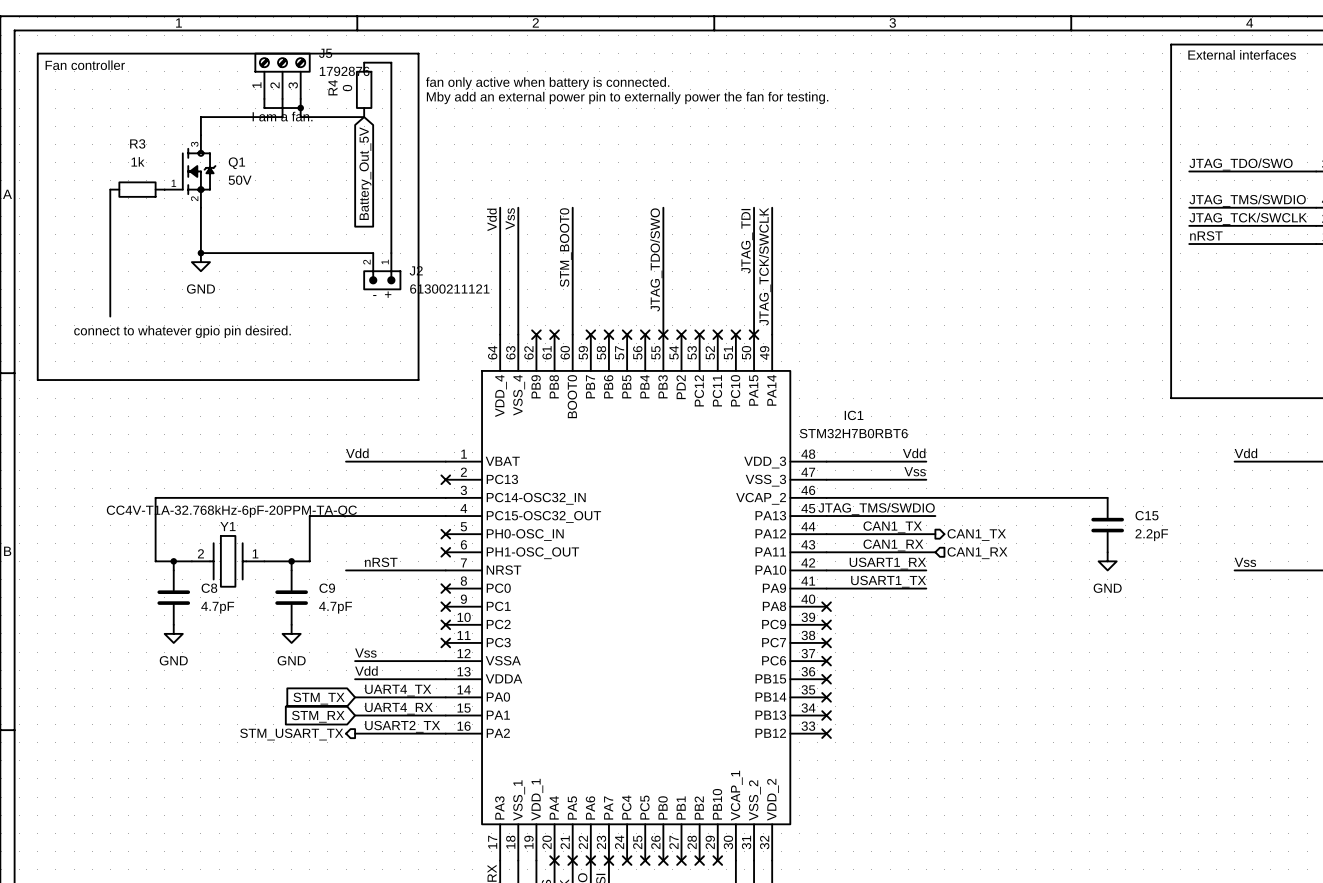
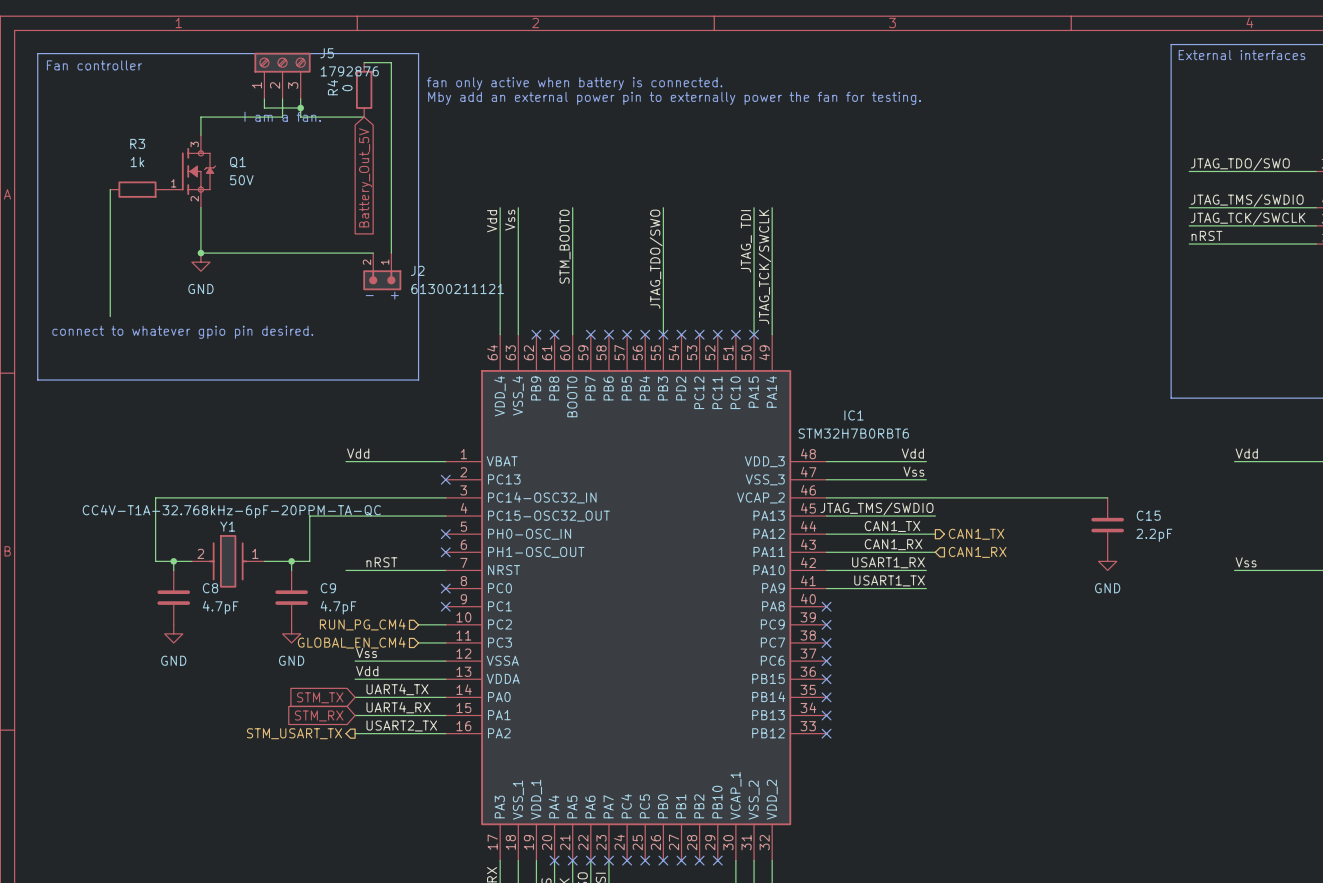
wire: none -> (418, 624) (445, 624)
no-connect mark: (445, 624) -> none
hierarchical label: none -> RUN_PG_CM4 (362, 624)
wire: none -> (418, 642) (445, 642)
no-connect mark: (445, 642) -> none
hierarchical label: none -> GLOBAL_EN_CM4 (351, 642)

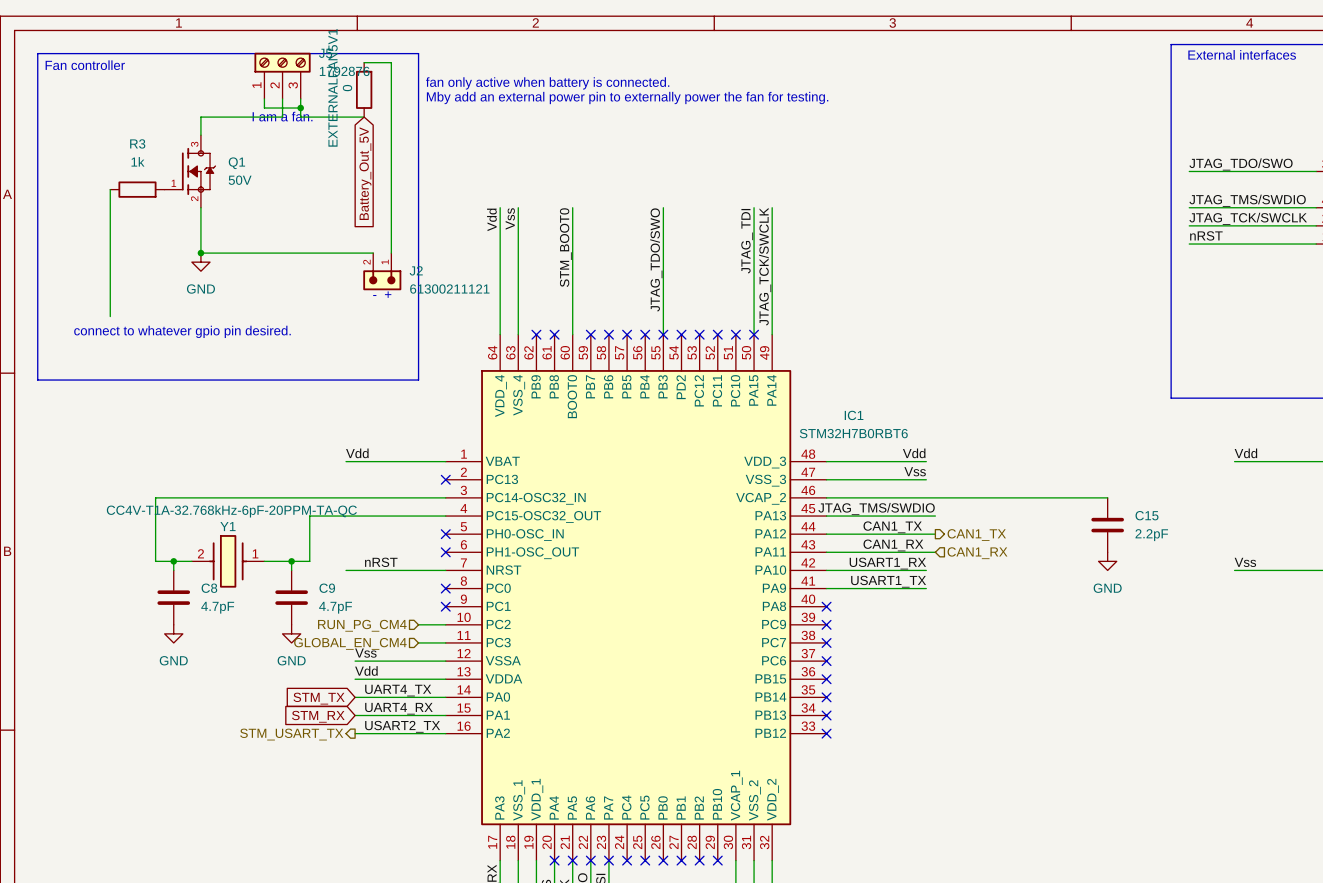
R4 name: R4 (332, 87) -> EXTERNALFAN5V1 (333, 87)

